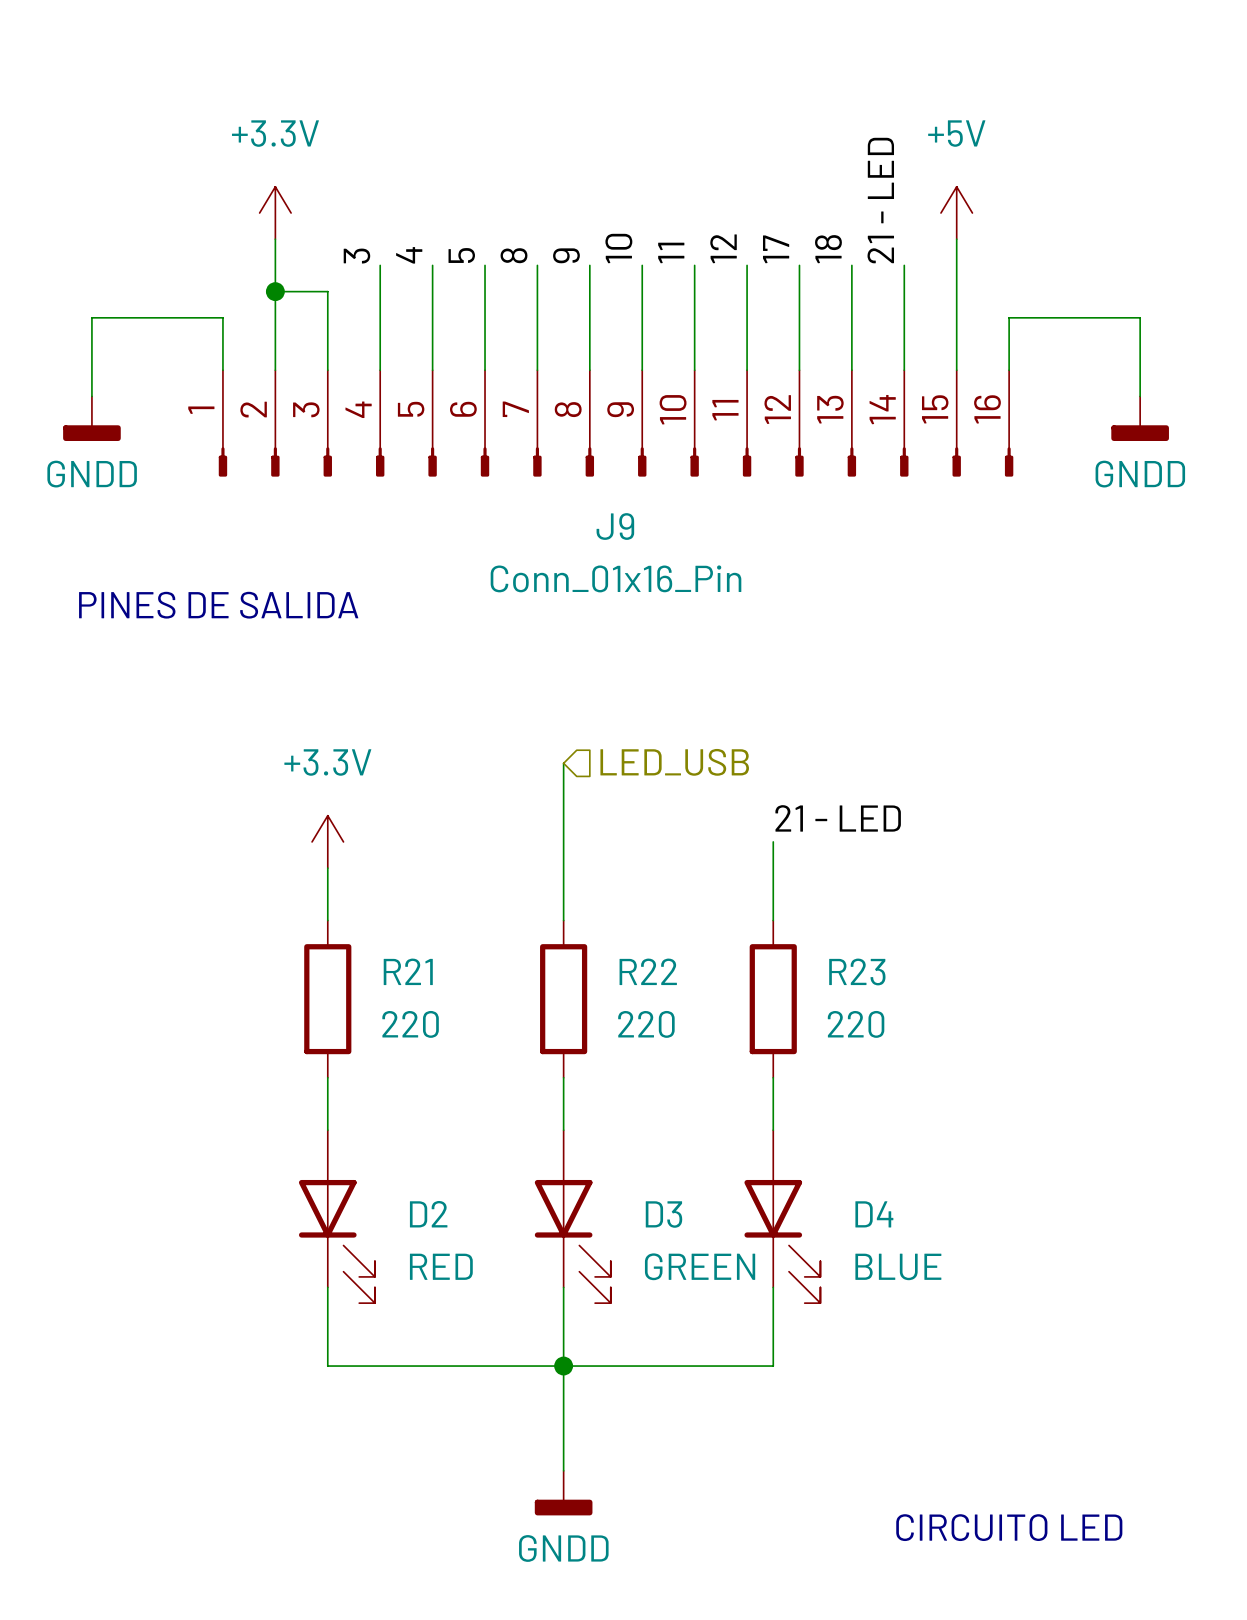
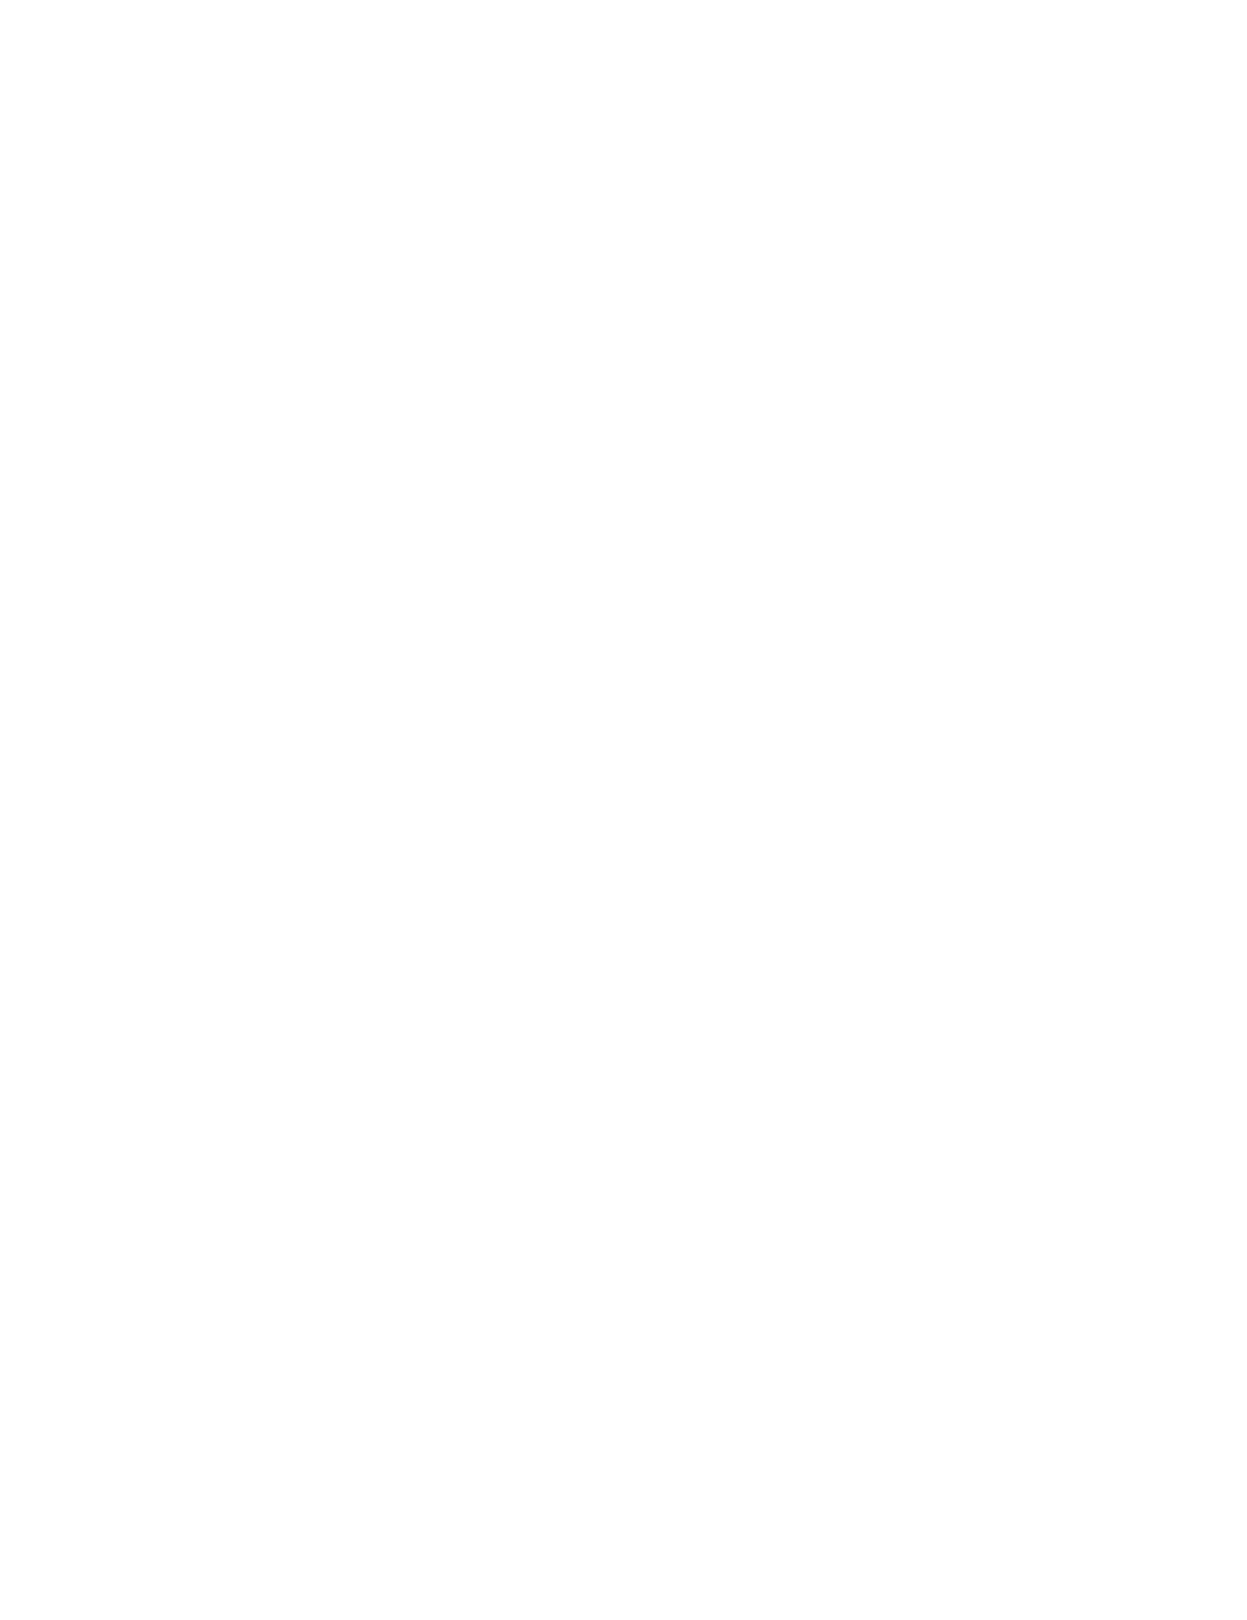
label: 21 - LED (880, 200) -> none
power symbol: +3.3V (275, 213) -> none
power symbol: +5V (956, 213) -> none
wire: (275, 239) (275, 370) -> none
wire: (956, 239) (956, 370) -> none
label: 10 (618, 248) -> none
label: 12 (723, 248) -> none
label: 17 (776, 249) -> none
label: 18 (828, 249) -> none
label: 11 (671, 252) -> none
label: 4 (409, 255) -> none
label: 5 (461, 255) -> none
label: 8 (514, 255) -> none
label: 9 (566, 255) -> none
label: 3 (356, 256) -> none
wire: (380, 265) (380, 370) -> none
wire: (432, 265) (432, 370) -> none
wire: (485, 265) (485, 370) -> none
wire: (537, 265) (537, 370) -> none
wire: (589, 265) (589, 370) -> none
wire: (642, 265) (642, 370) -> none
wire: (694, 265) (694, 370) -> none
wire: (747, 265) (747, 370) -> none
wire: (799, 265) (799, 370) -> none
wire: (851, 265) (851, 370) -> none
wire: (904, 265) (904, 370) -> none
wire: (275, 291) (327, 291) (327, 370) -> none
junction: (275, 291) -> none
wire: (222, 370) (222, 317) (91, 317) (91, 396) -> none
wire: (1009, 370) (1009, 317) (1140, 317) (1140, 396) -> none
power symbol: GNDD (91, 418) -> none
power symbol: GNDD (1140, 418) -> none
J9: Conn_01x16_Pin (616, 423) -> none
text: PINES DE SALIDA (218, 605) -> none
hierarchical label: LED_USB (674, 762) -> none
wire: (563, 763) (563, 920) -> none
label: 21 - LED (838, 818) -> none
power symbol: +3.3V (327, 841) -> none
wire: (773, 841) (773, 920) -> none
wire: (327, 868) (327, 920) -> none
R21: 220 (327, 999) -> none
R22: 220 (563, 999) -> none
R23: 220 (773, 999) -> none
wire: (327, 1077) (327, 1130) -> none
wire: (563, 1077) (563, 1130) -> none
wire: (773, 1077) (773, 1130) -> none
D2: RED (336, 1216) -> none
D3: GREEN (572, 1216) -> none
D4: BLUE (782, 1216) -> none
wire: (327, 1287) (327, 1366) (773, 1366) (773, 1287) -> none
wire: (563, 1287) (563, 1470) -> none
junction: (563, 1366) -> none
power symbol: GNDD (563, 1493) -> none
text: CIRCUITO LED (1009, 1527) -> none

